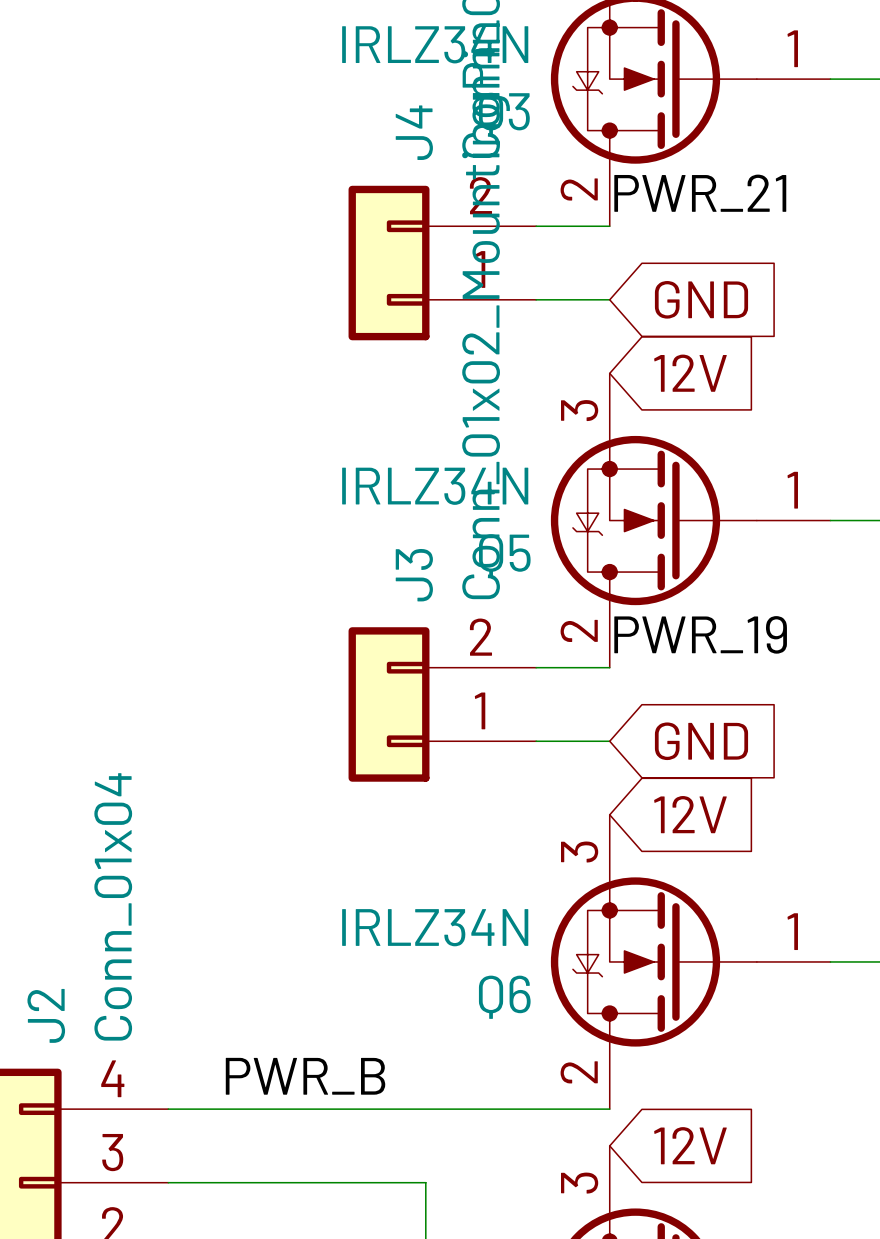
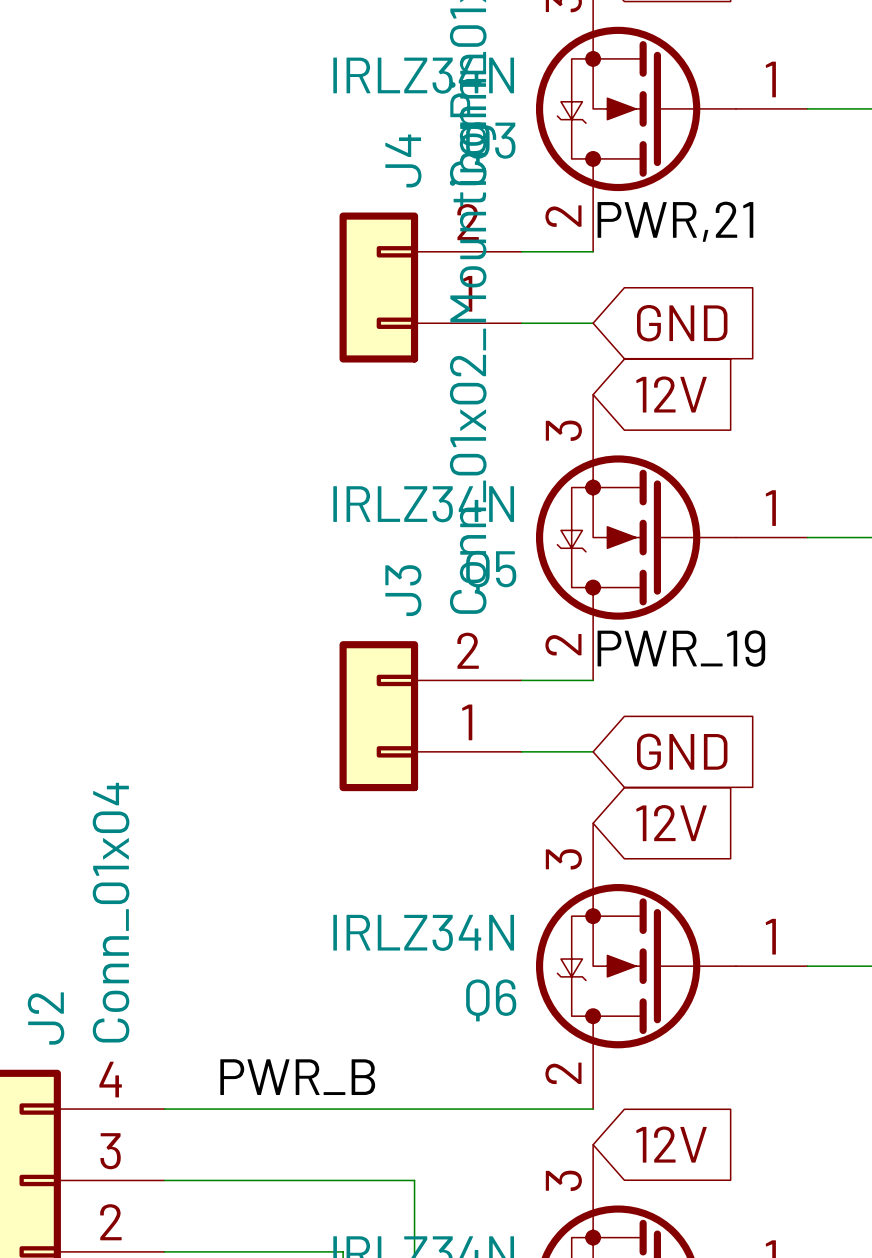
label: PWR_21 (700, 193) -> PWR,21 (675, 221)

